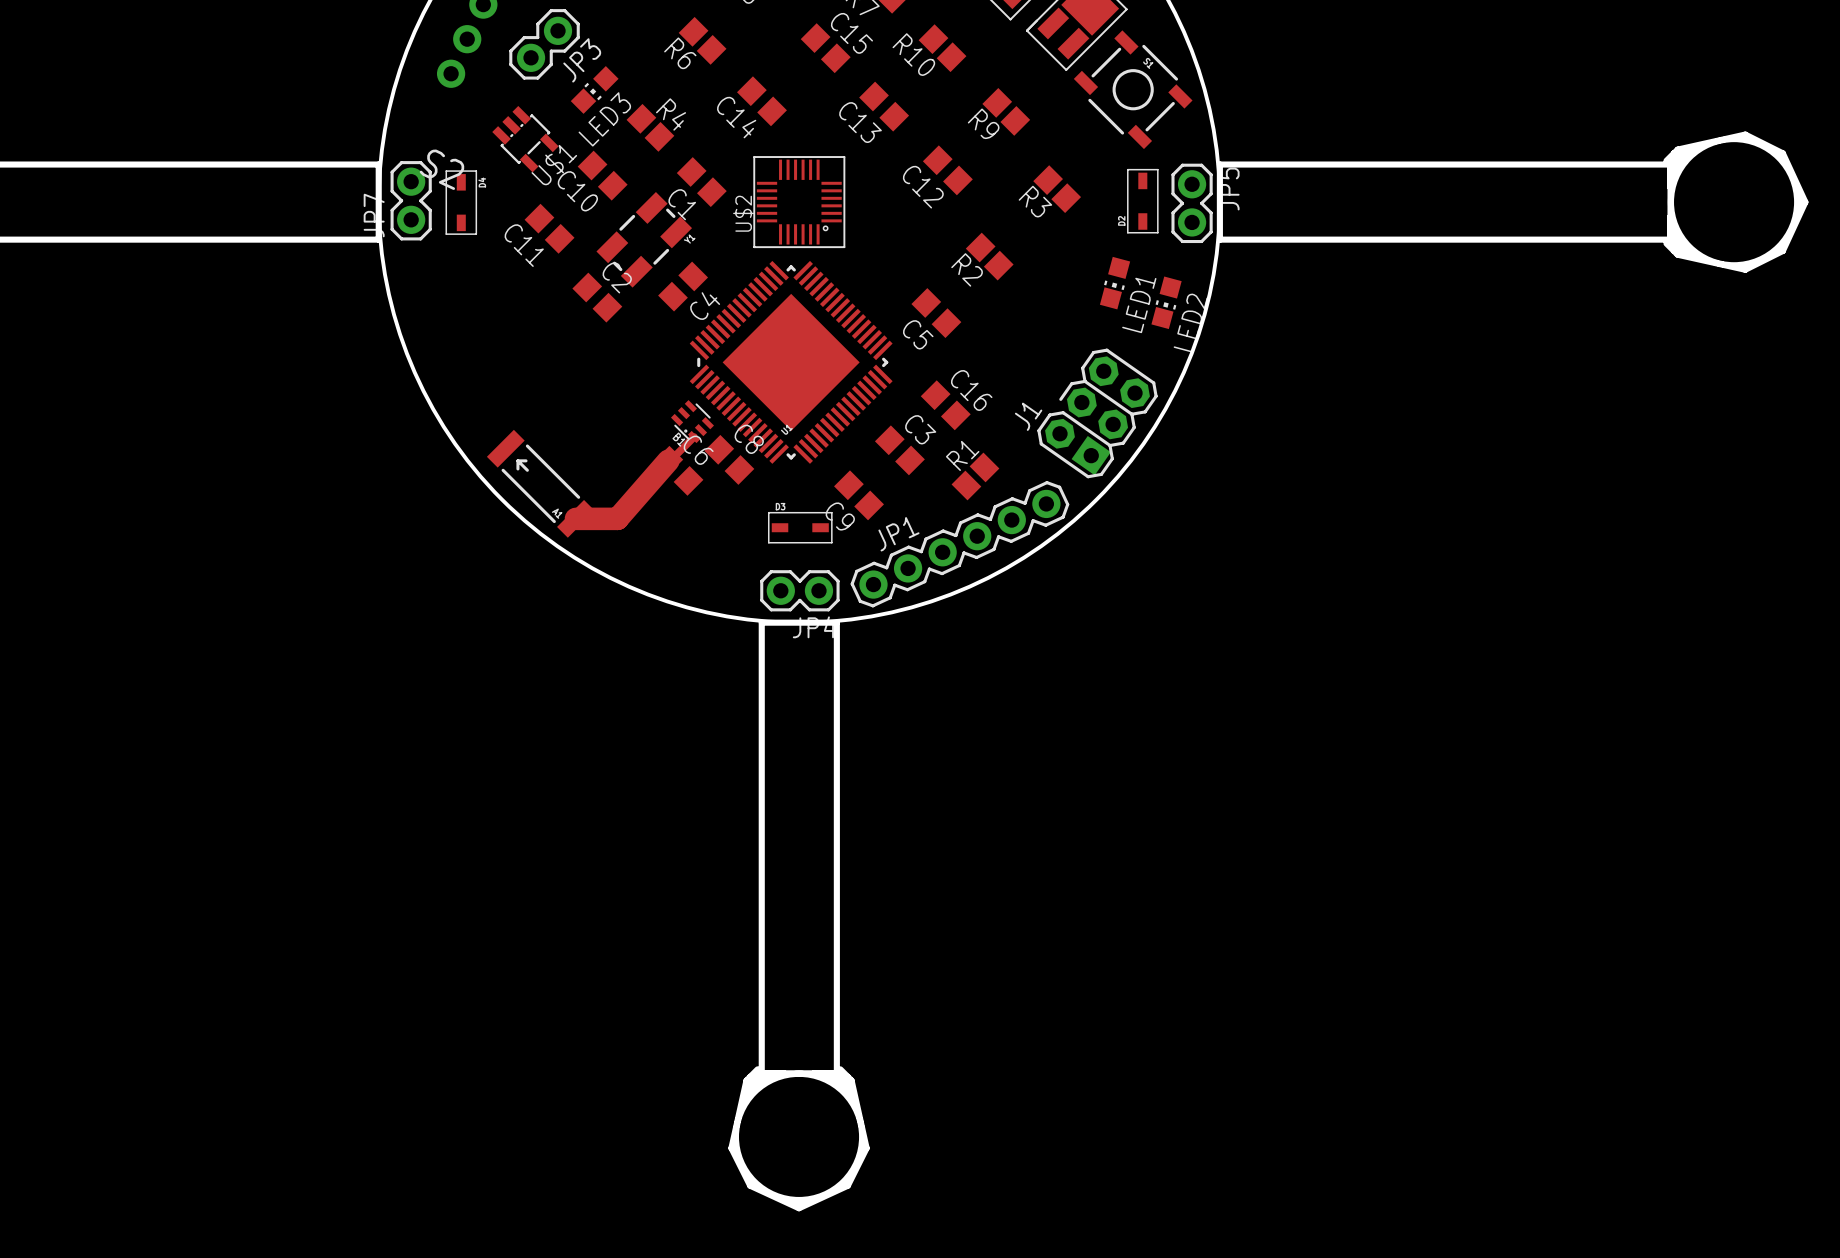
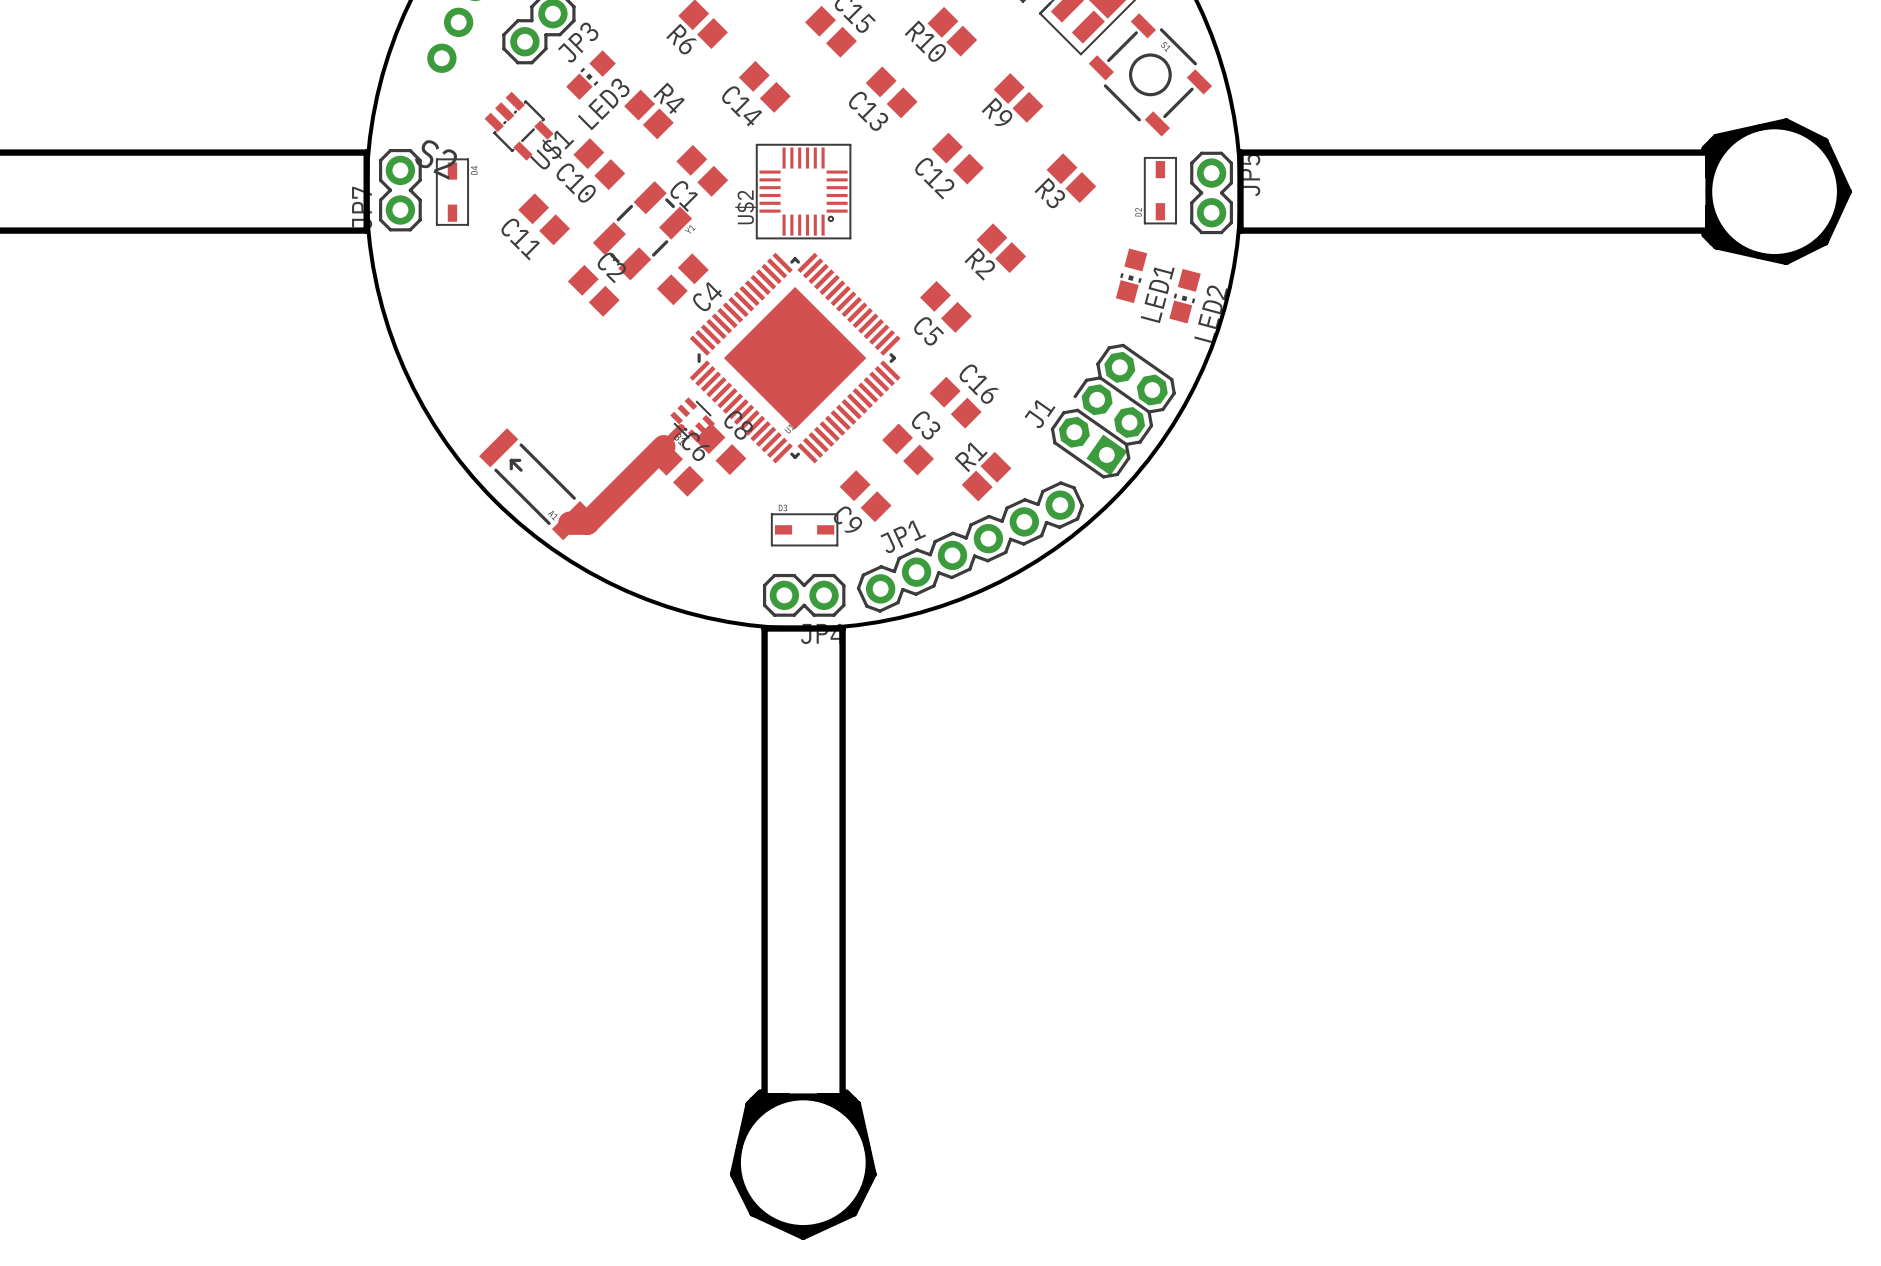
track: none -> (681, 427) (587, 523) (569, 523)
track: (694, 437) (668, 460) (617, 518) (575, 518) -> none
C8 position: (729, 459) -> (720, 449)

